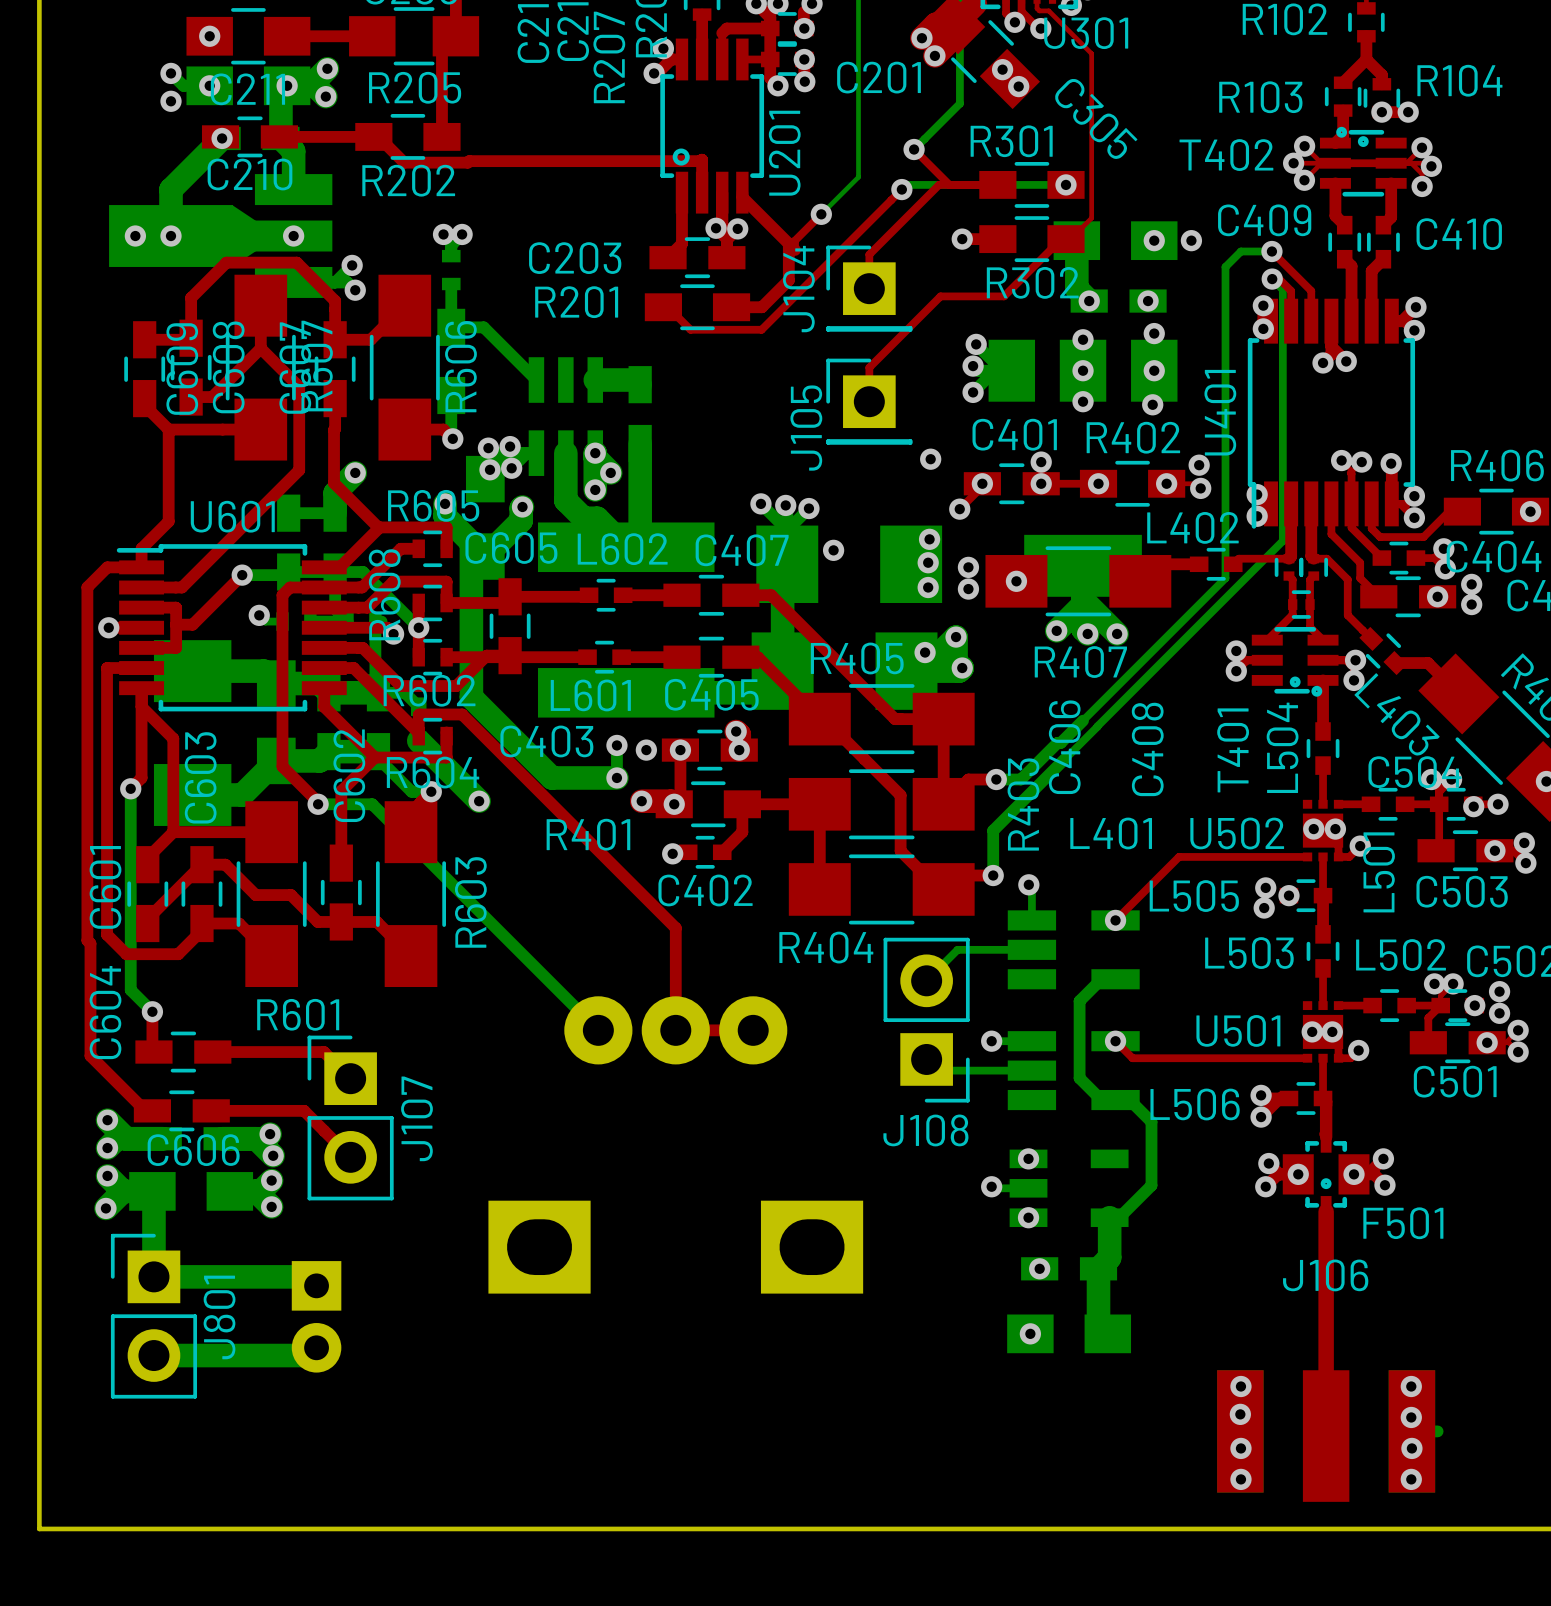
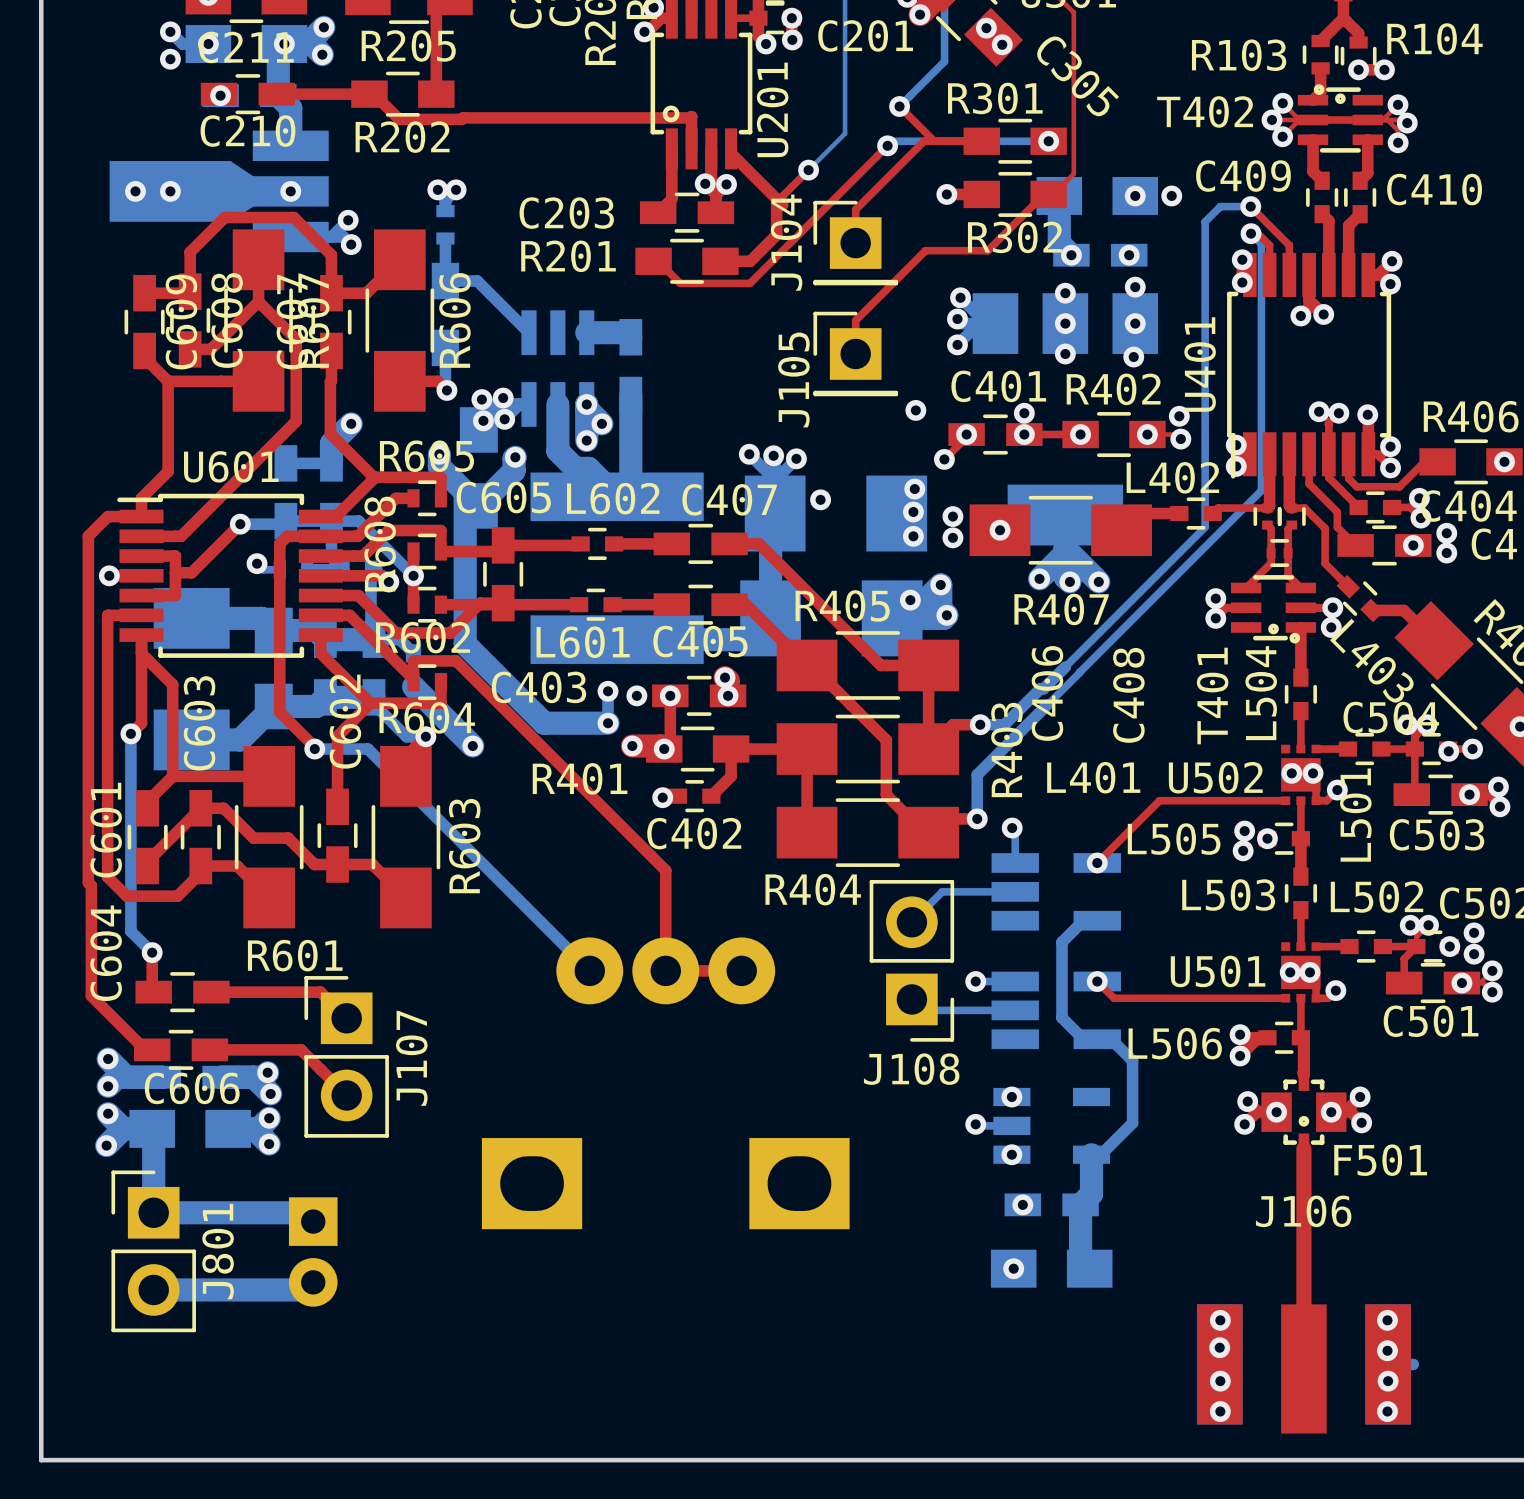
bottom track: (222, 138) (171, 189) (171, 220) -> none

